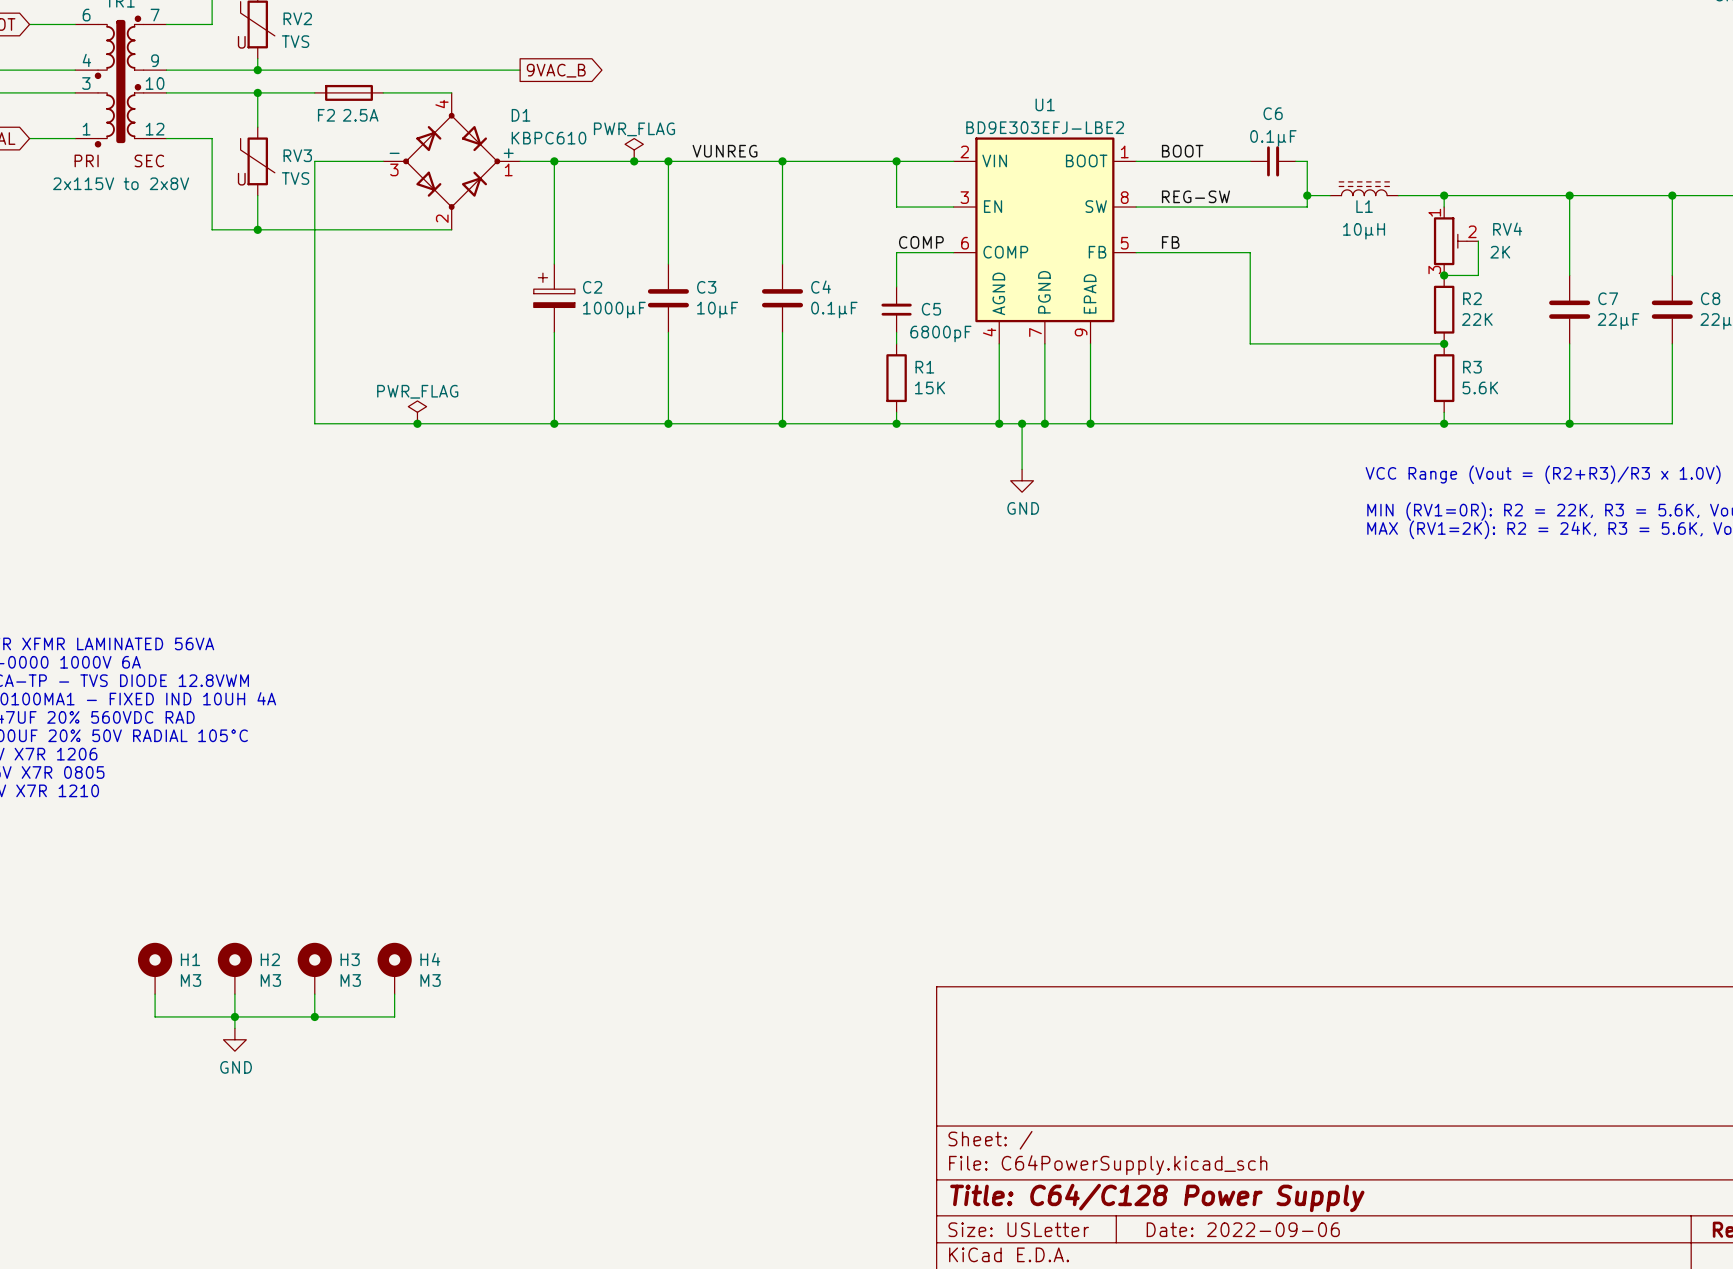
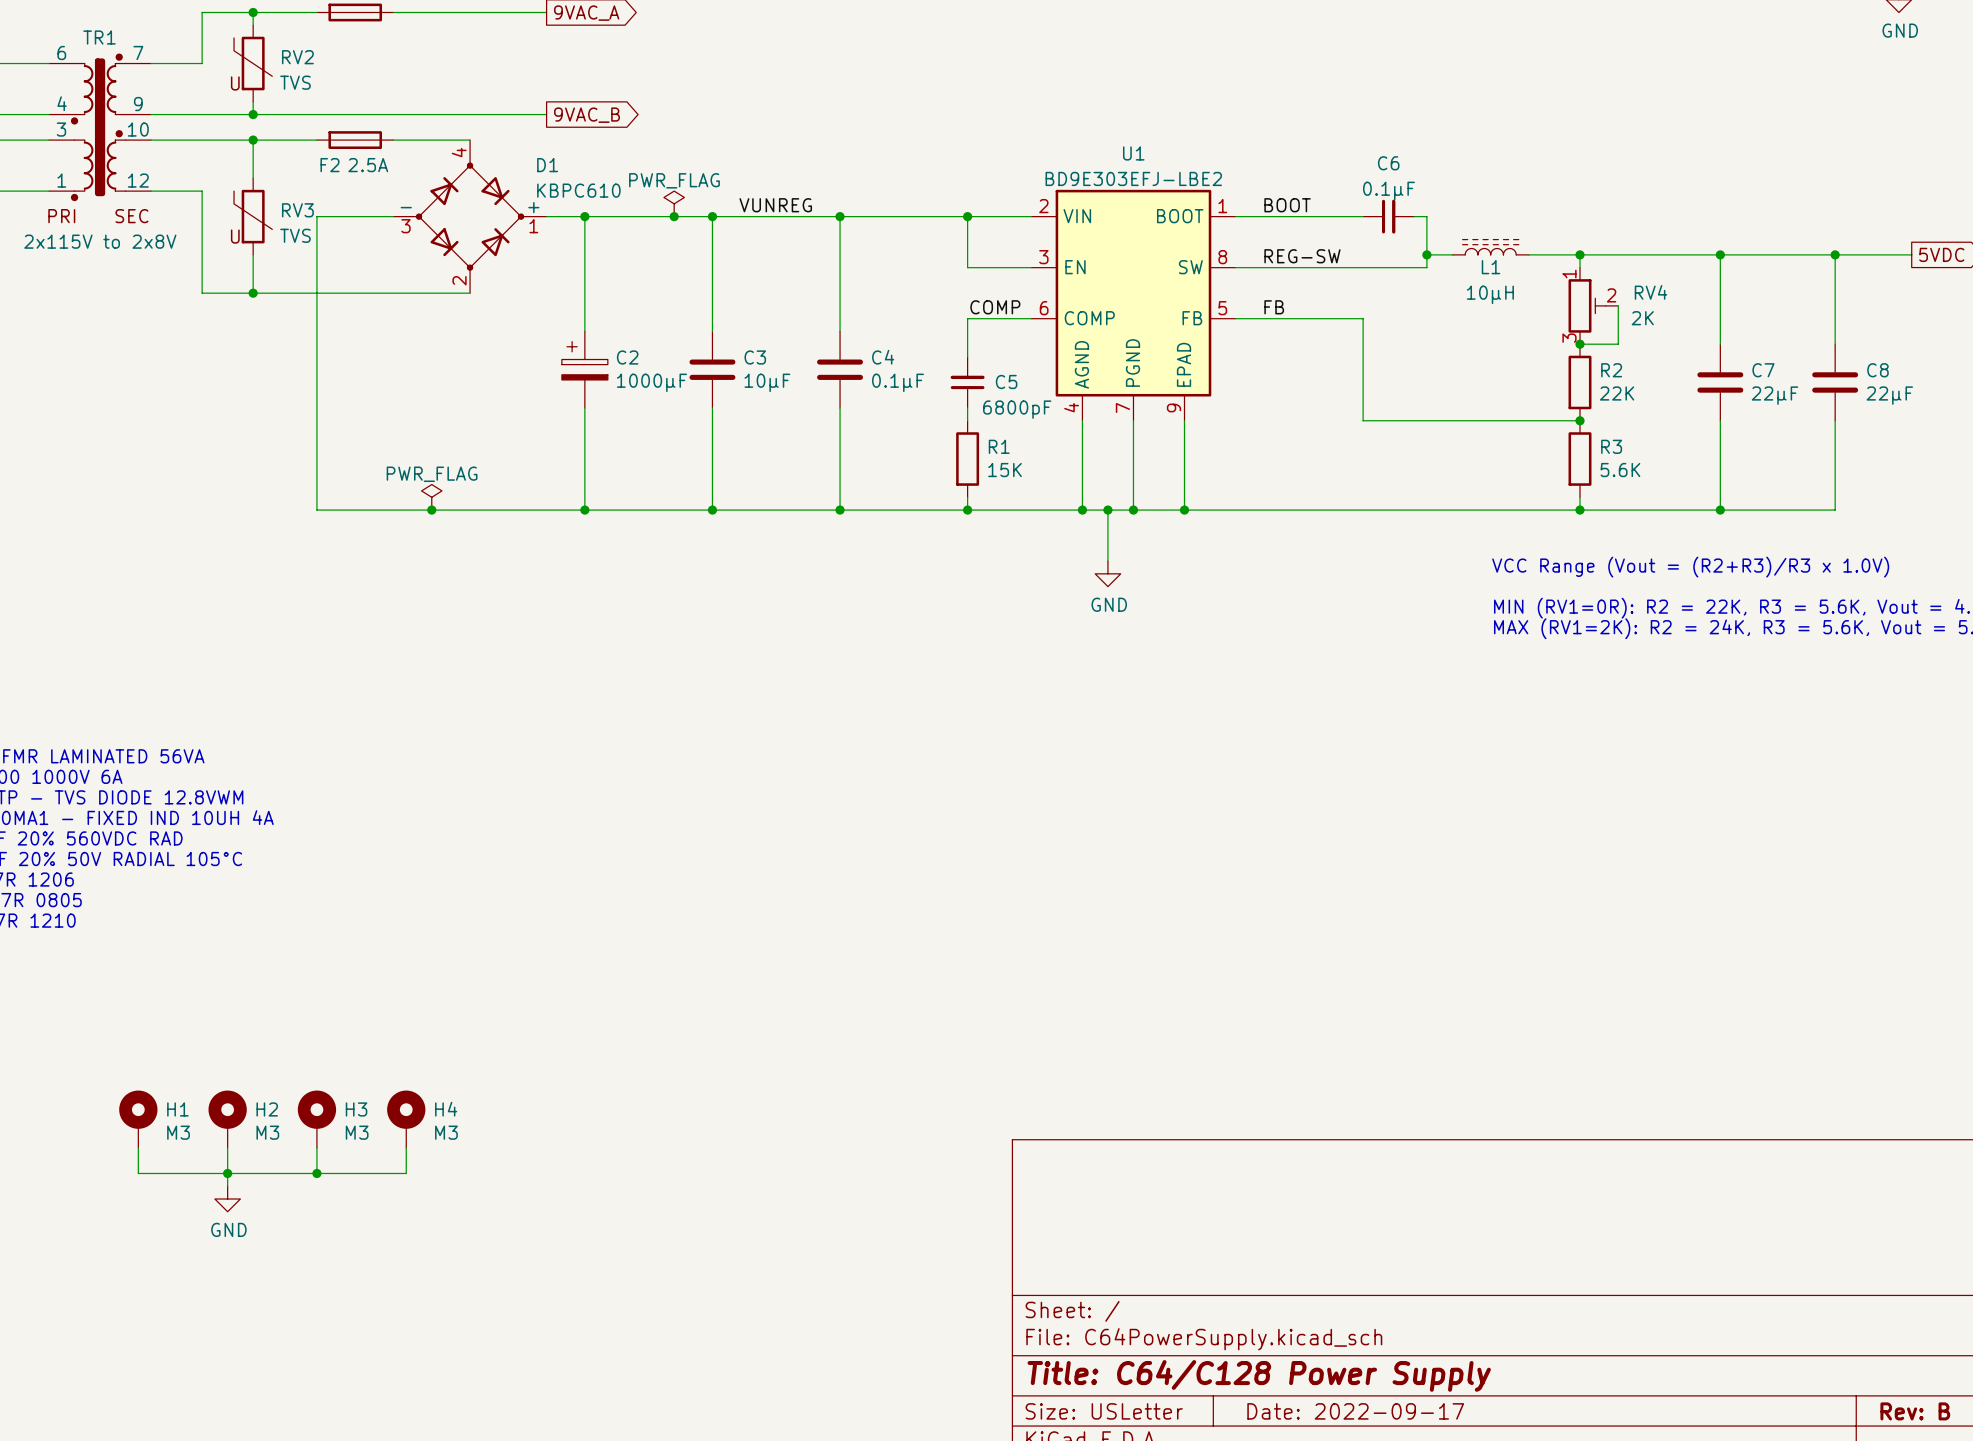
title block: Date: 2022-09-06 (1243, 1229) -> Date: 2022-09-17 (1355, 1411)

